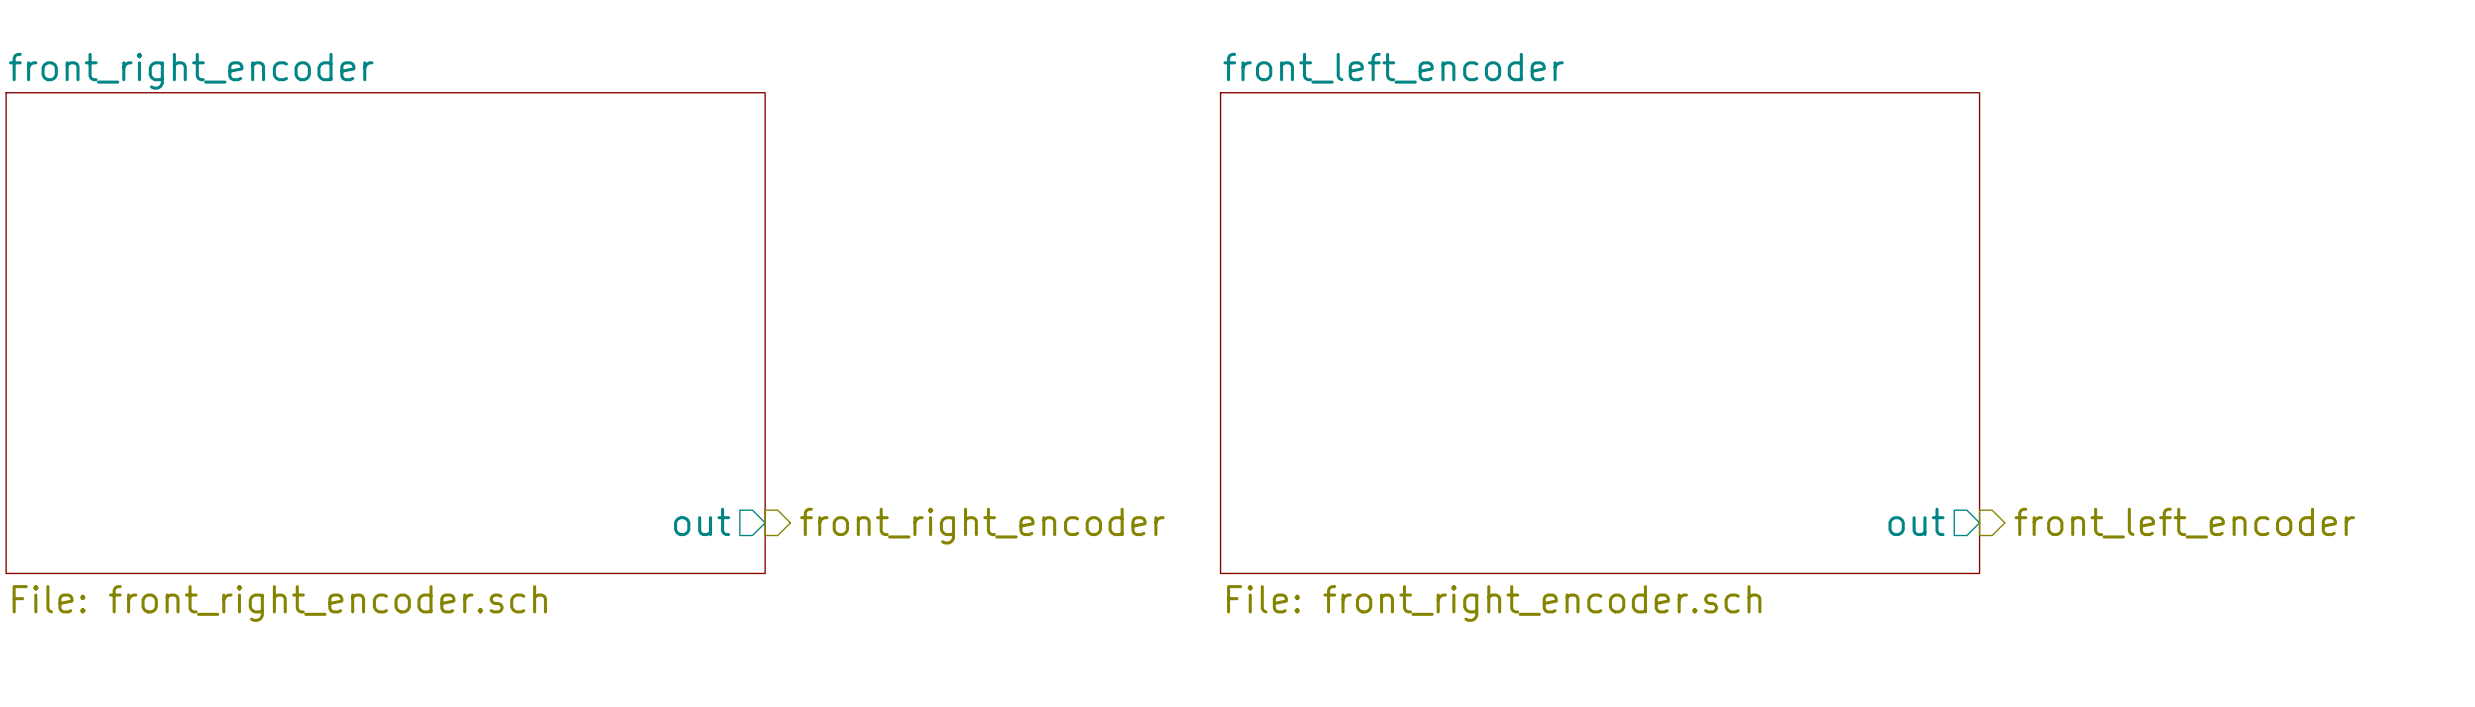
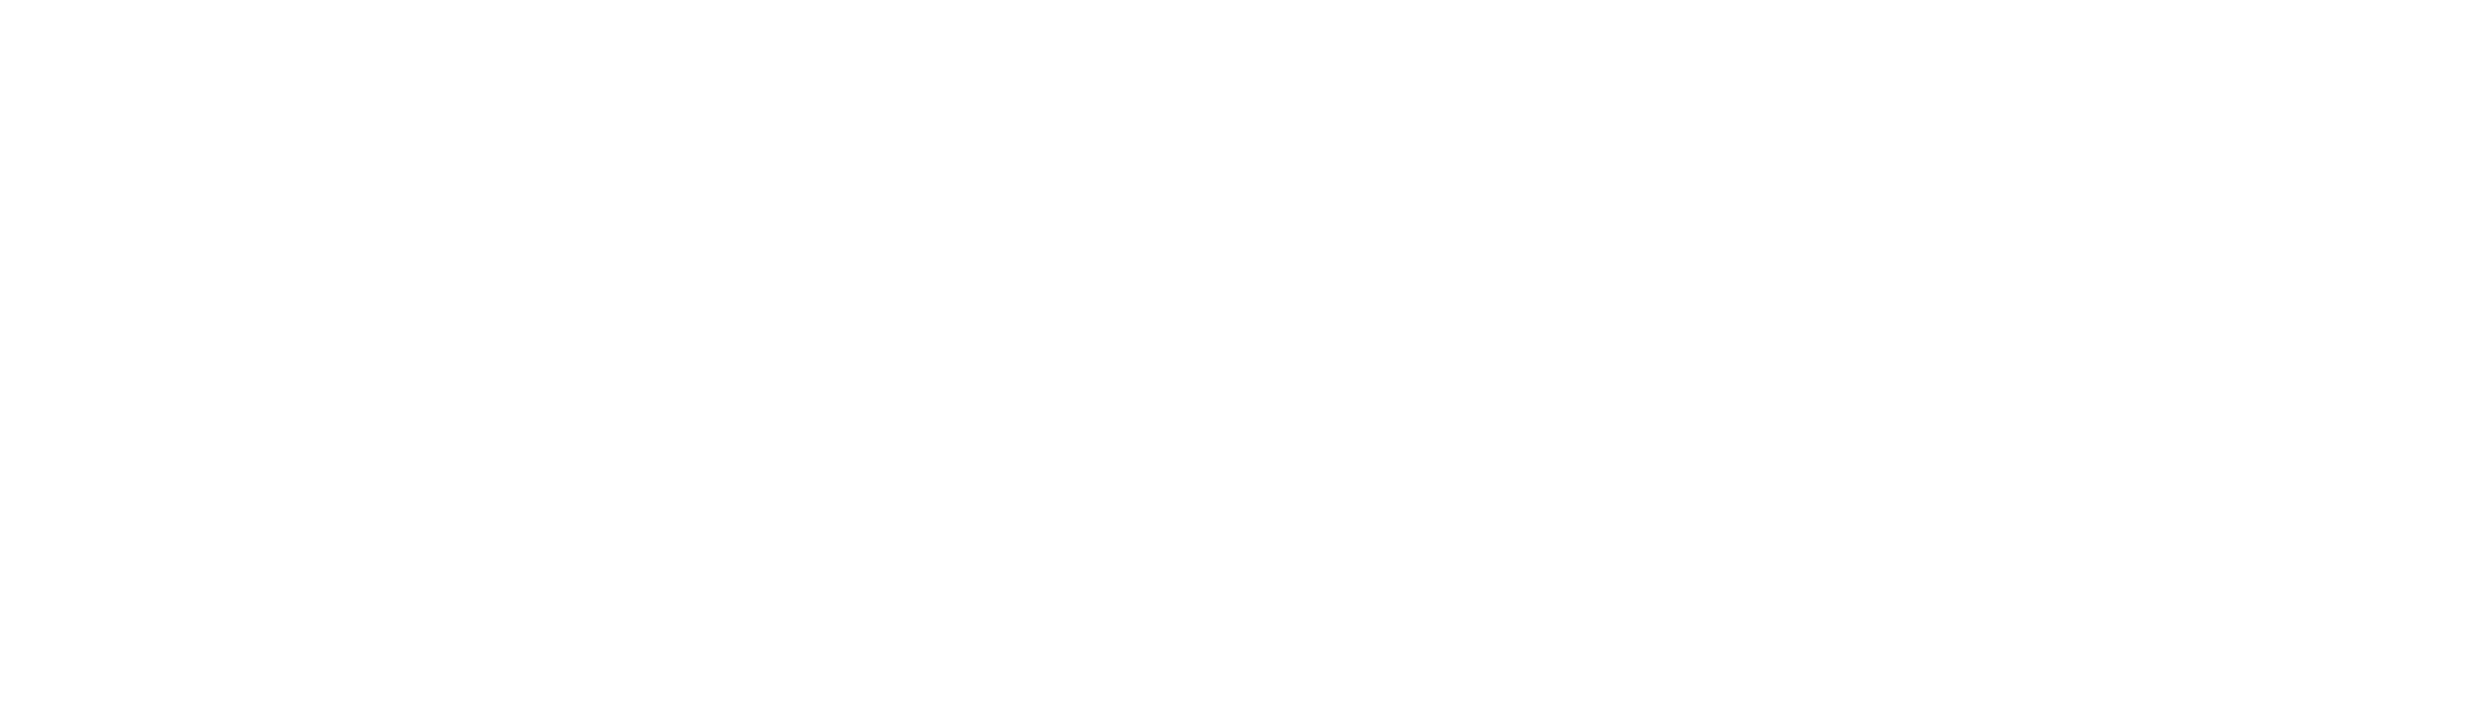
sheet front_right_encoder: File: front_right_encoder.sch (385, 333) -> none
sheet front_left_encoder: File: front_right_encoder.sch (1600, 333) -> none
sheet pin: out (702, 521) -> none
sheet pin: out (1916, 521) -> none
hierarchical label: front_left_encoder (2184, 523) -> none
hierarchical label: front_right_encoder (982, 526) -> none

